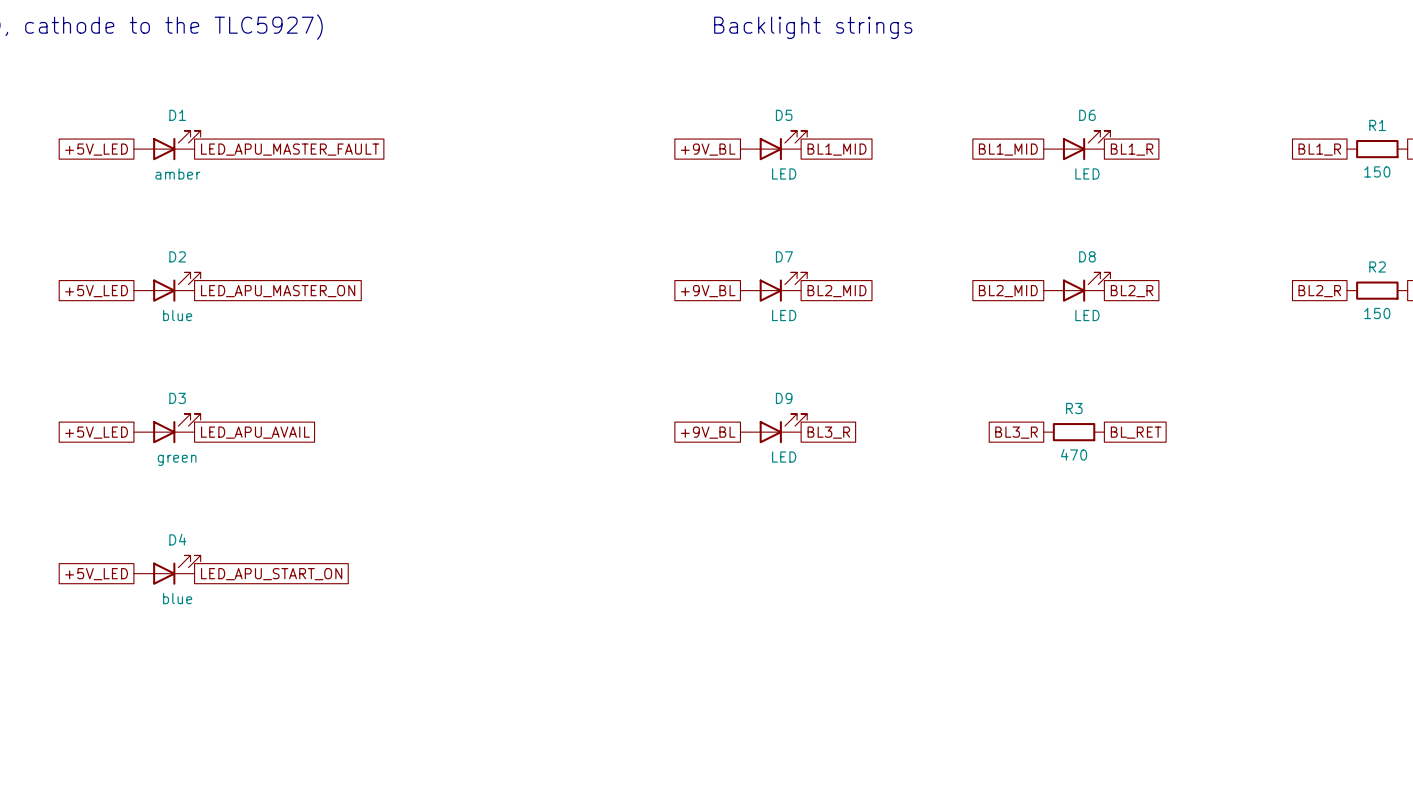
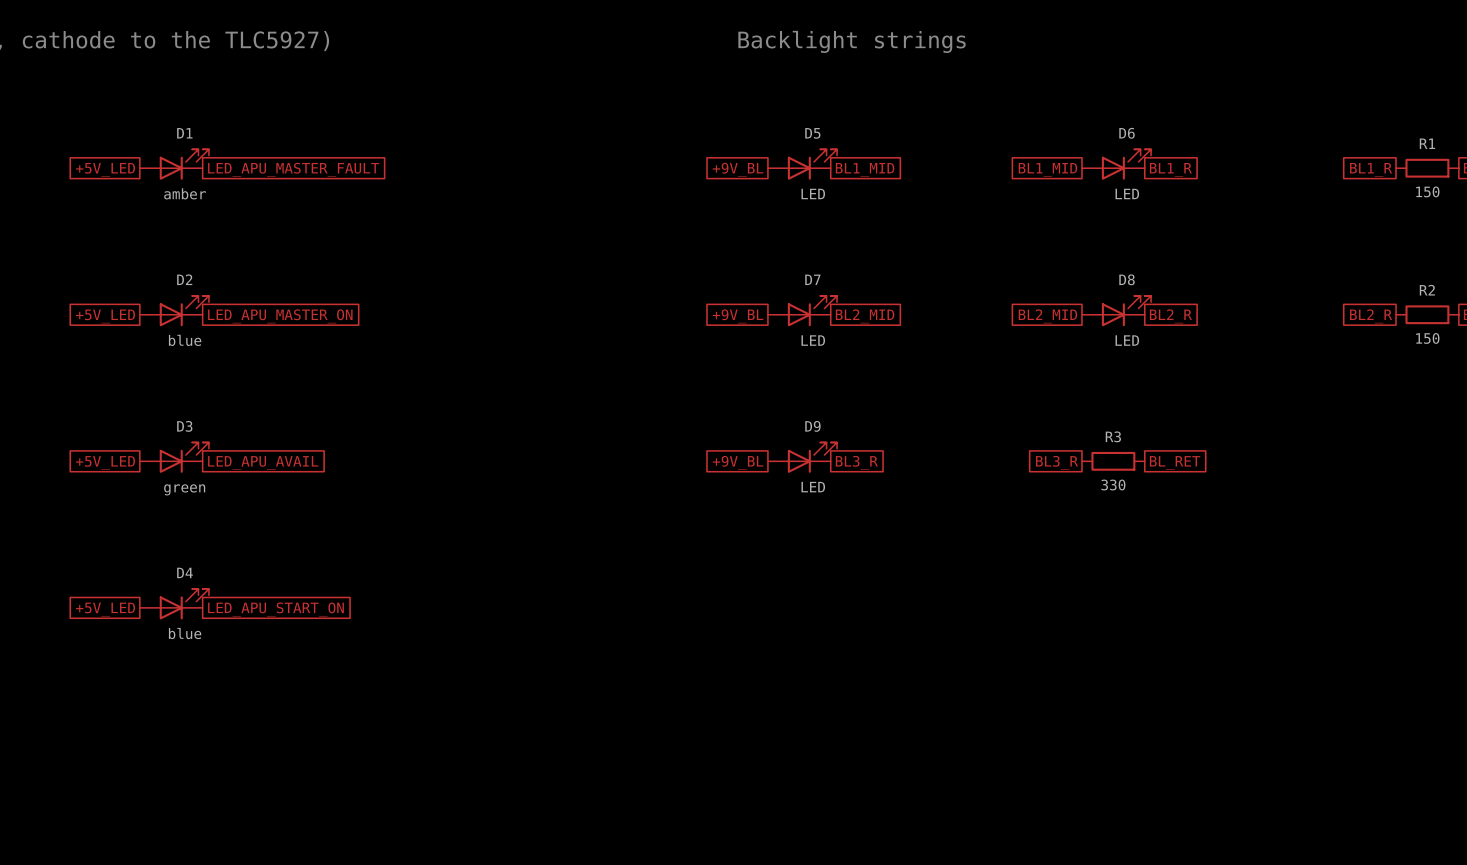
R3 value: 470 (1074, 454) -> 330 (1113, 485)

